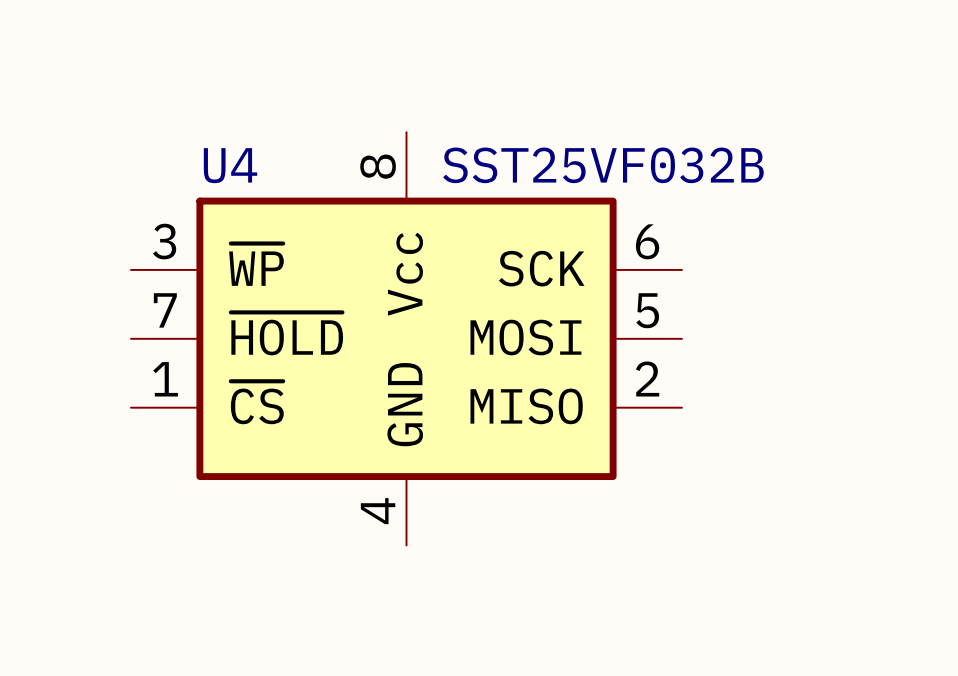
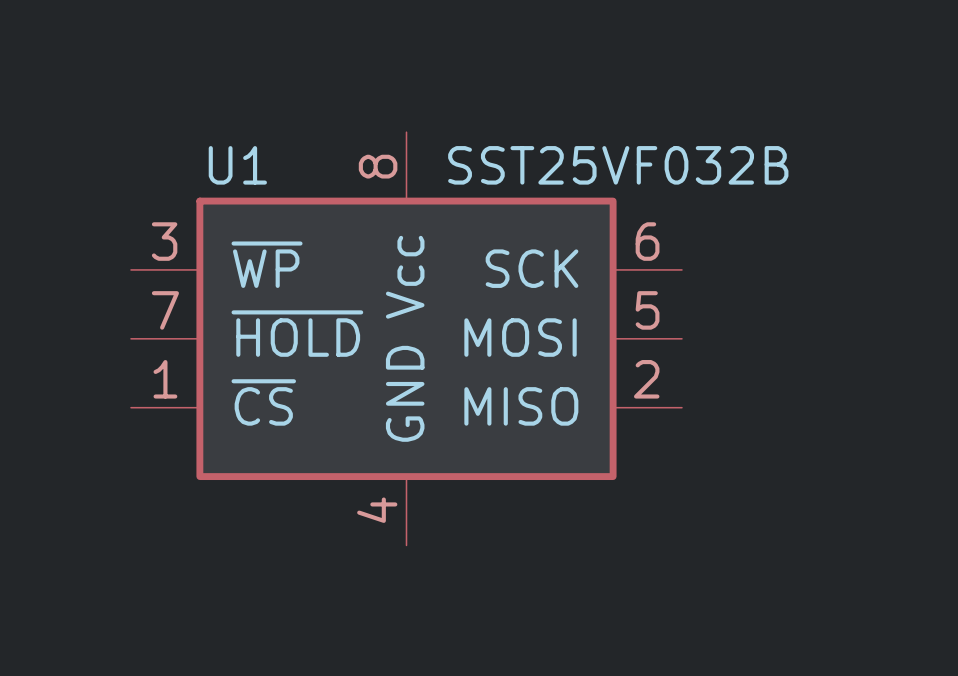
U4 name: U4 (230, 165) -> U1 (237, 165)

